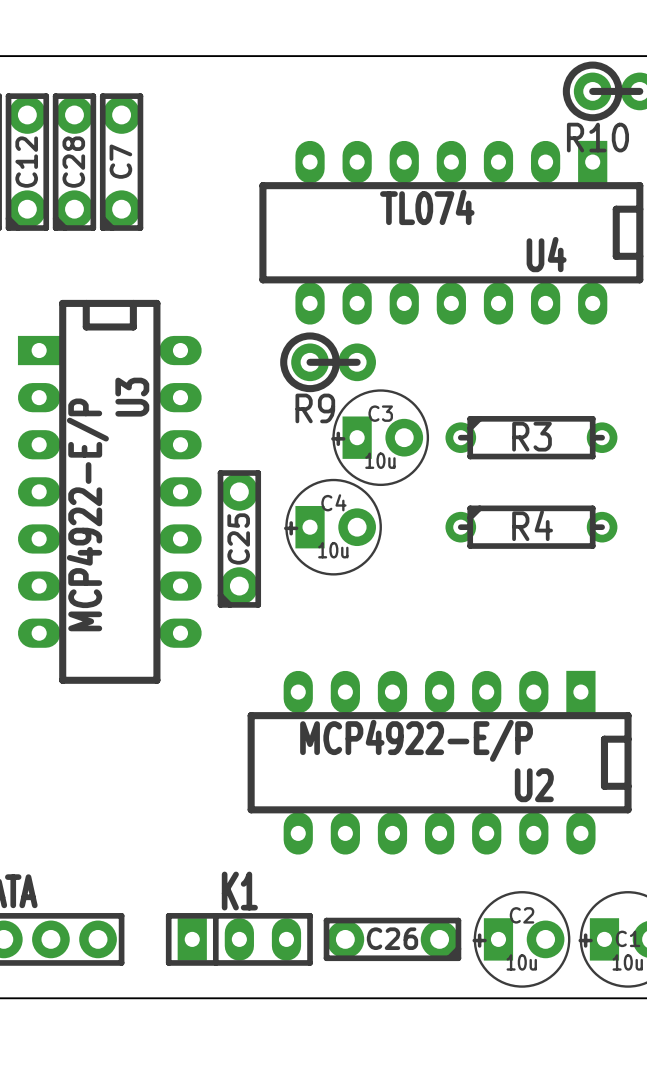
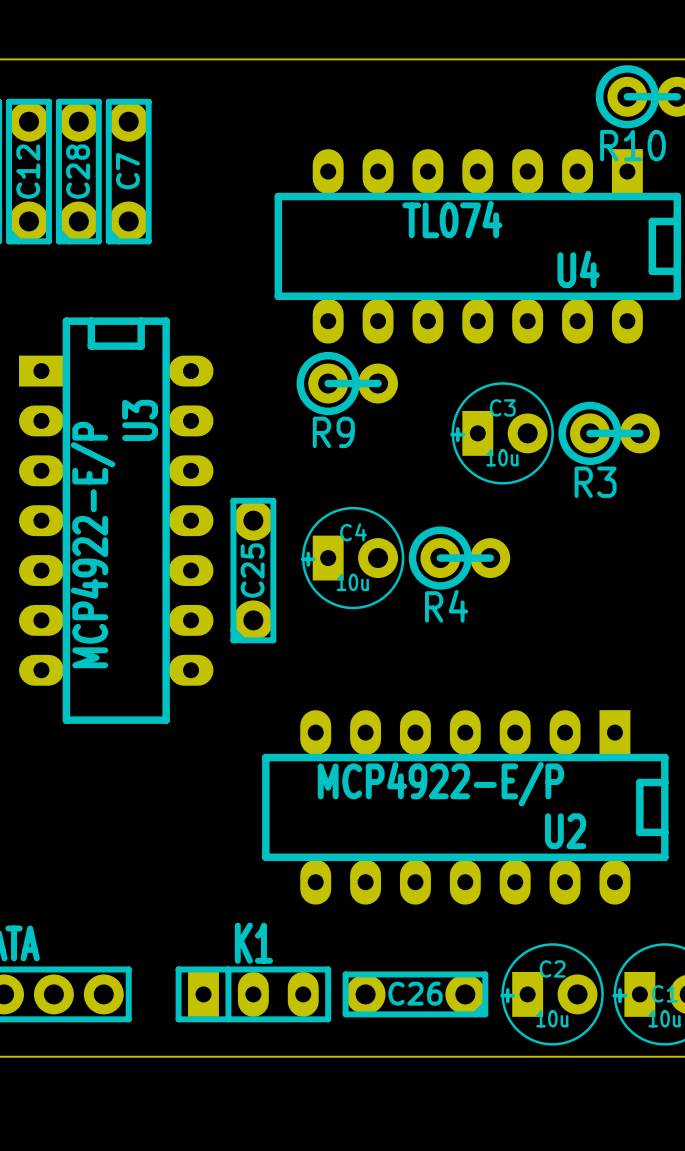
R3 footprint: [445, 416, 618, 460] -> [558, 401, 660, 466]
R3 name position: R3 (532, 436) -> R3 (595, 482)
C3 position: (380, 437) -> (502, 433)
R4 footprint: [445, 505, 618, 549] -> [408, 526, 511, 590]
R4 name position: R4 (532, 525) -> R4 (446, 606)

